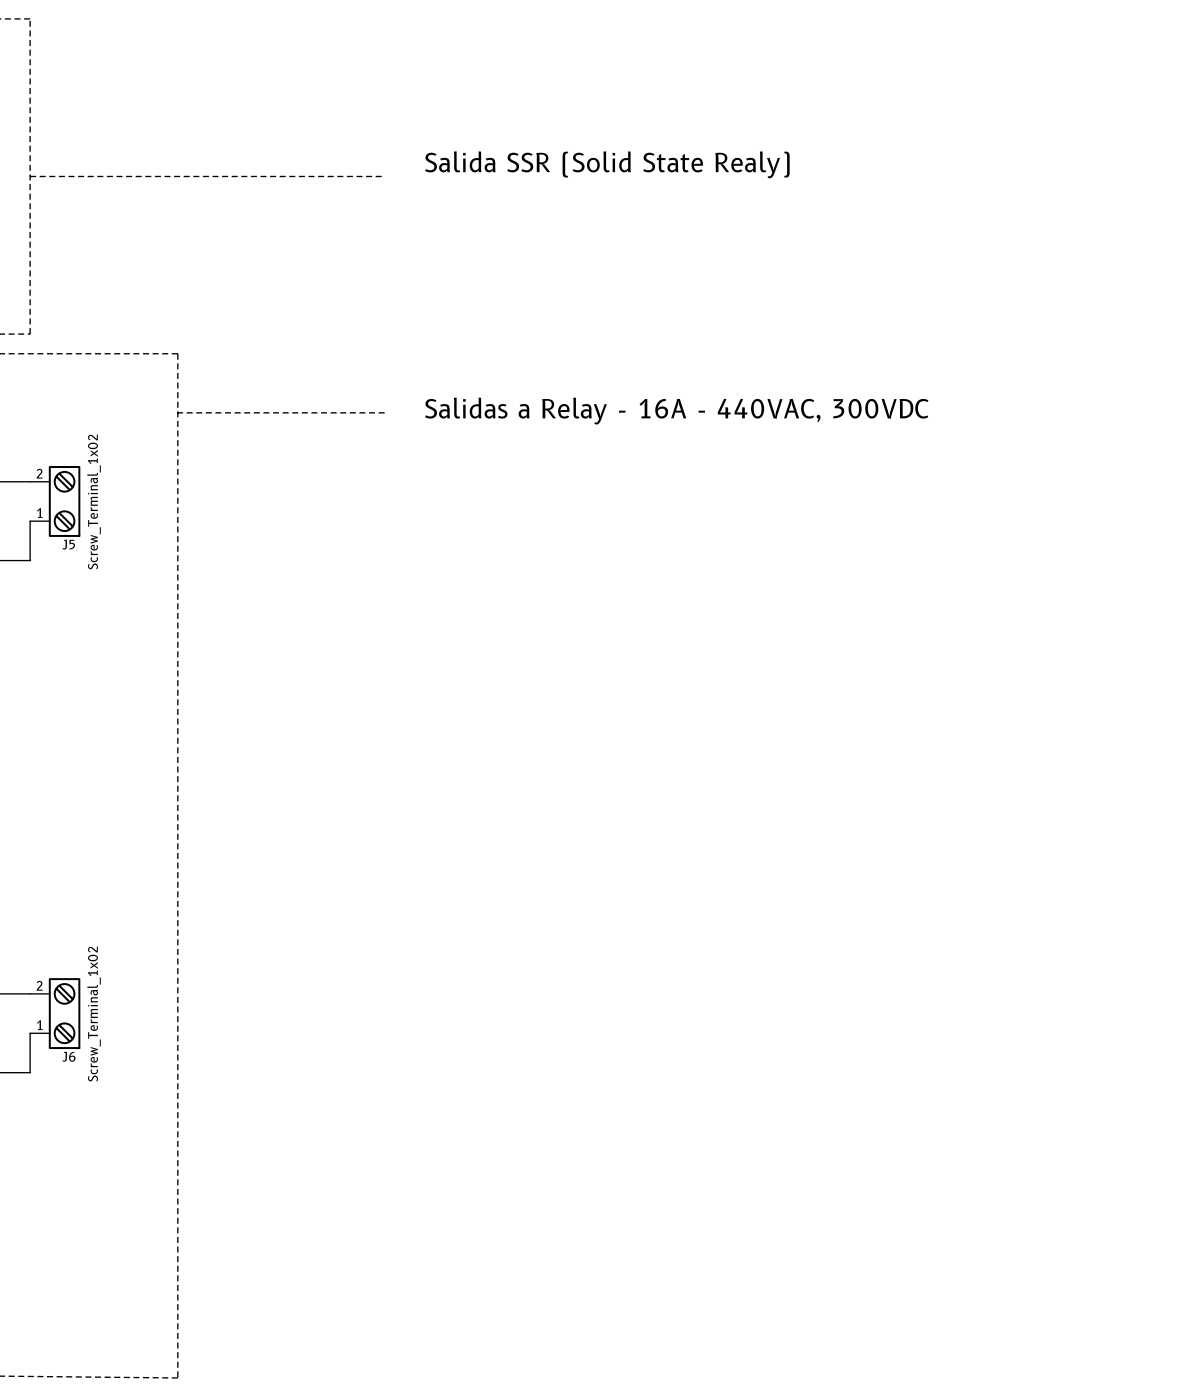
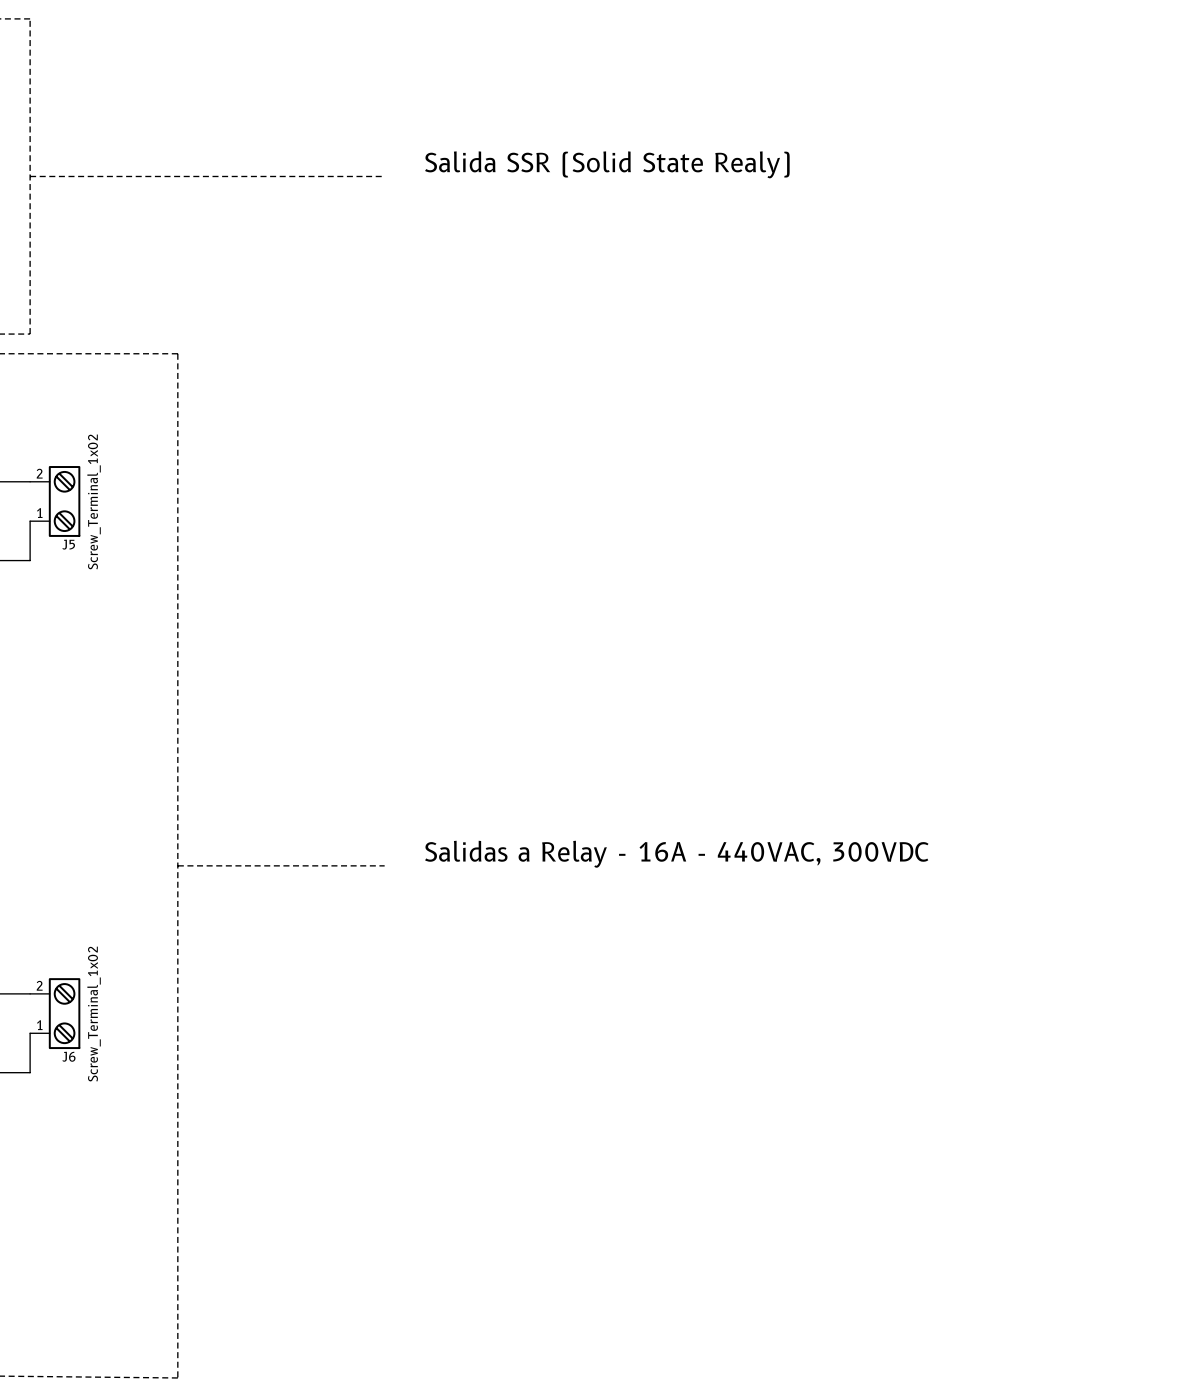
text: Salidas a Relay - 16A - 440VAC, 300VDC (676, 411) -> none
line: (177, 412) (384, 412) -> none
text: none -> Salidas a Relay - 16A - 440VAC, 300VDC (676, 854)
line: none -> (177, 865) (384, 865)

